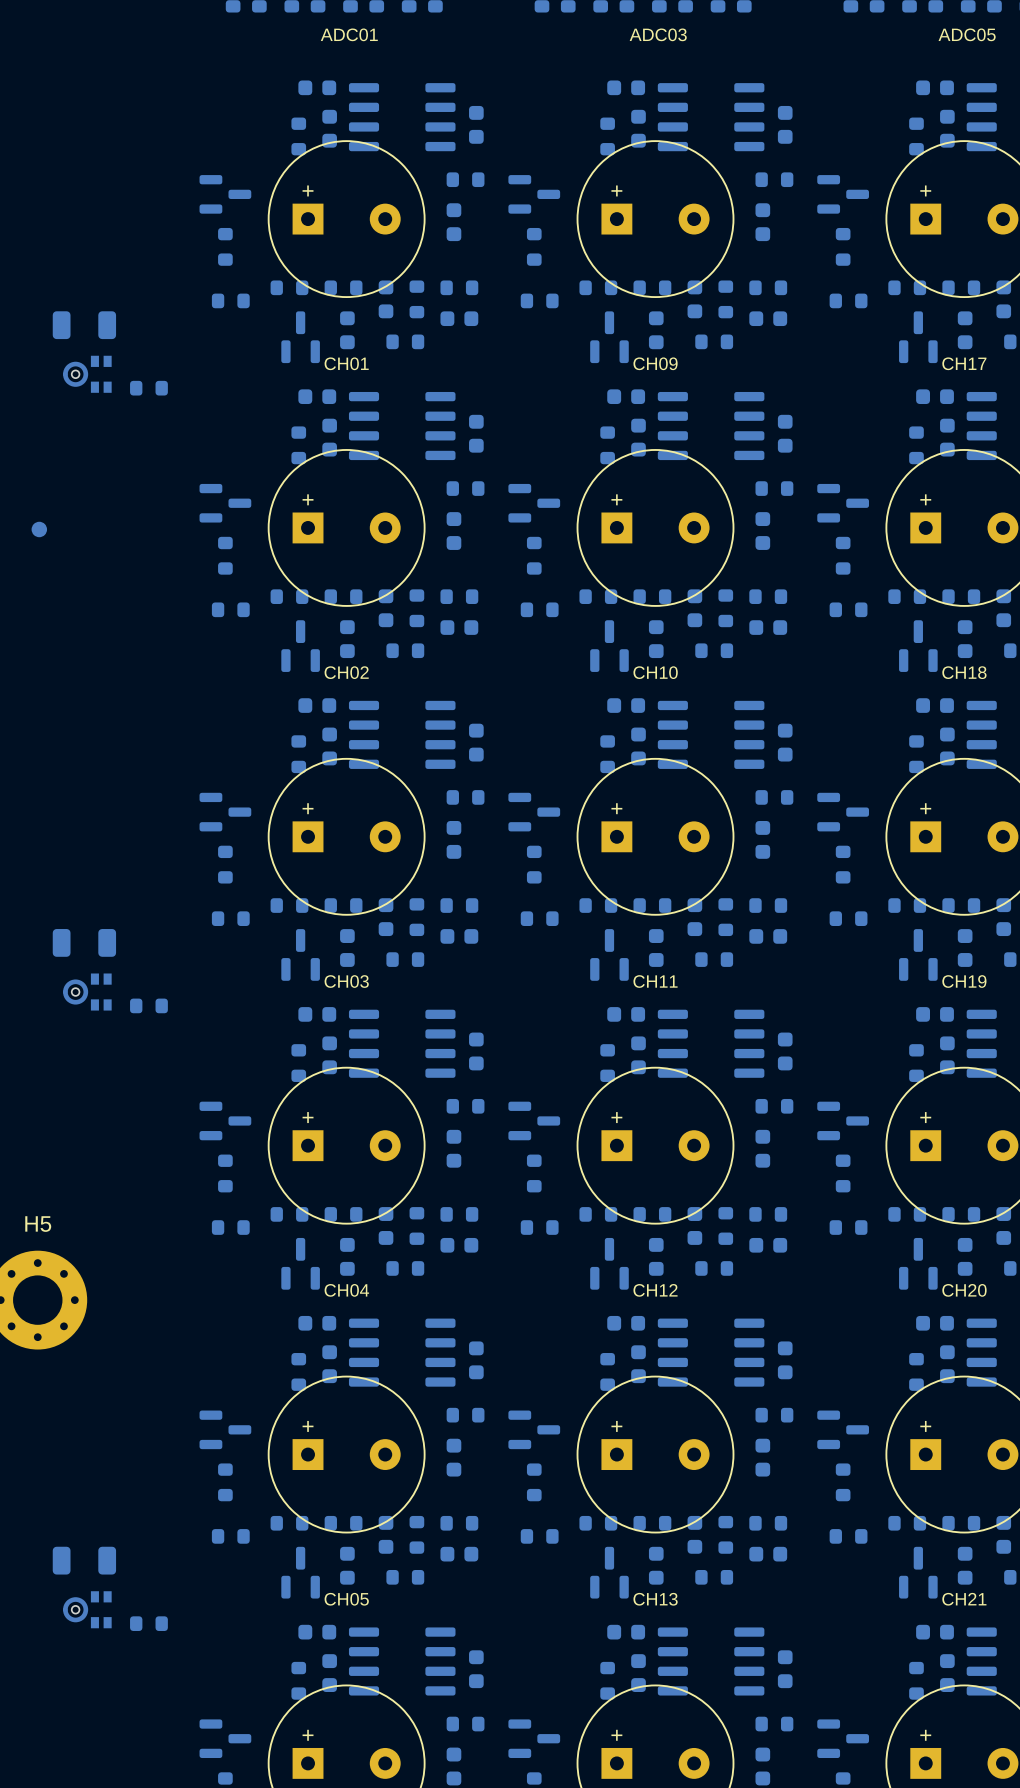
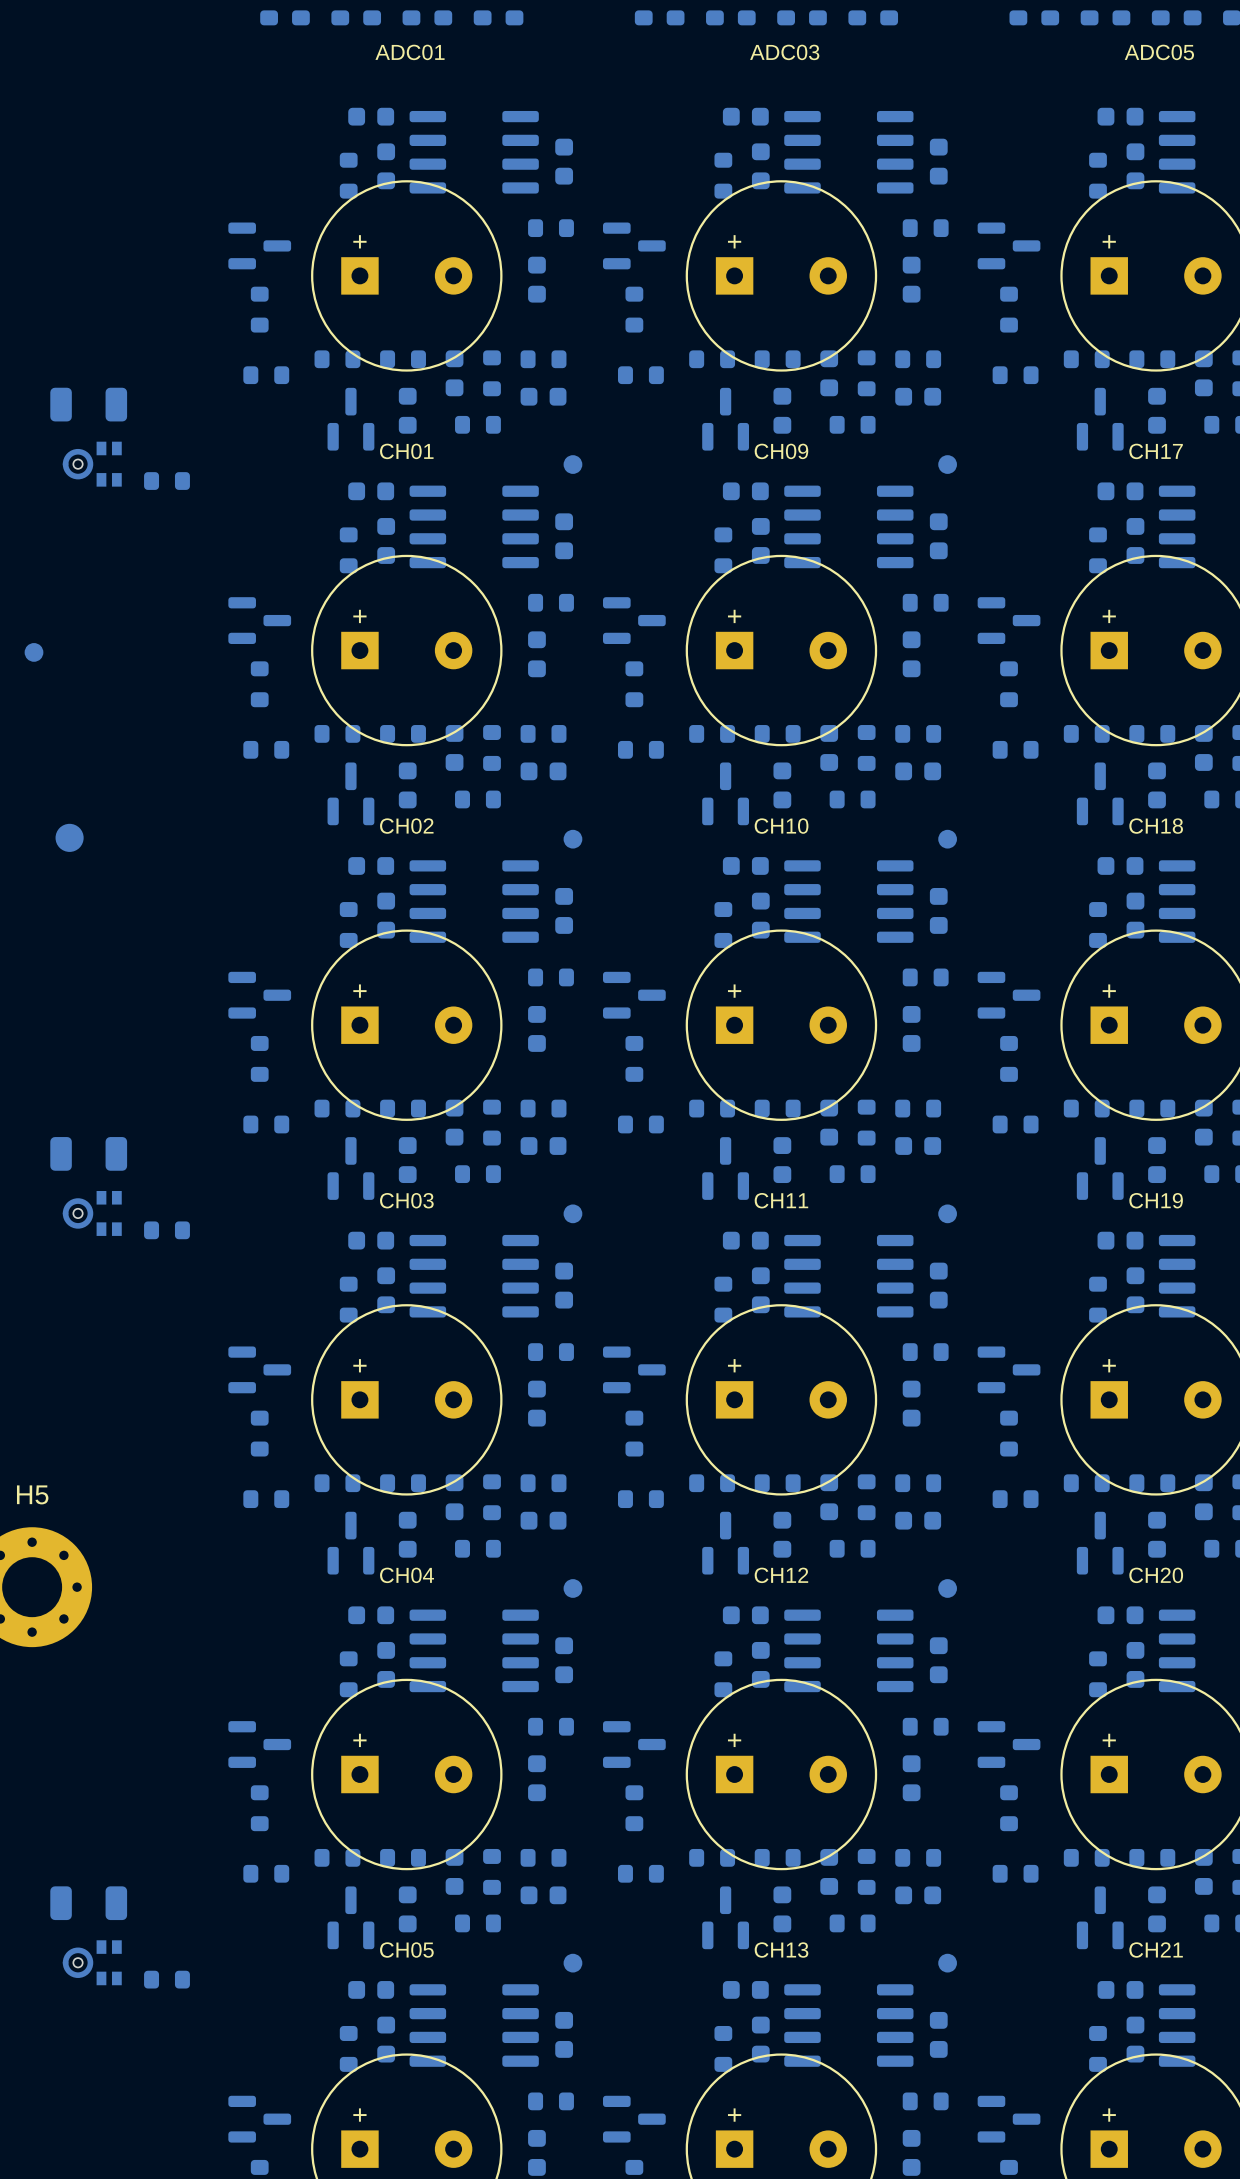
part: none -> (572, 464)
part: none -> (947, 464)
part: none -> (69, 837)
part: none -> (572, 839)
part: none -> (947, 839)
part: none -> (572, 1213)
part: none -> (947, 1213)
part: none -> (572, 1588)
part: none -> (947, 1588)
part: none -> (572, 1963)
part: none -> (947, 1963)

